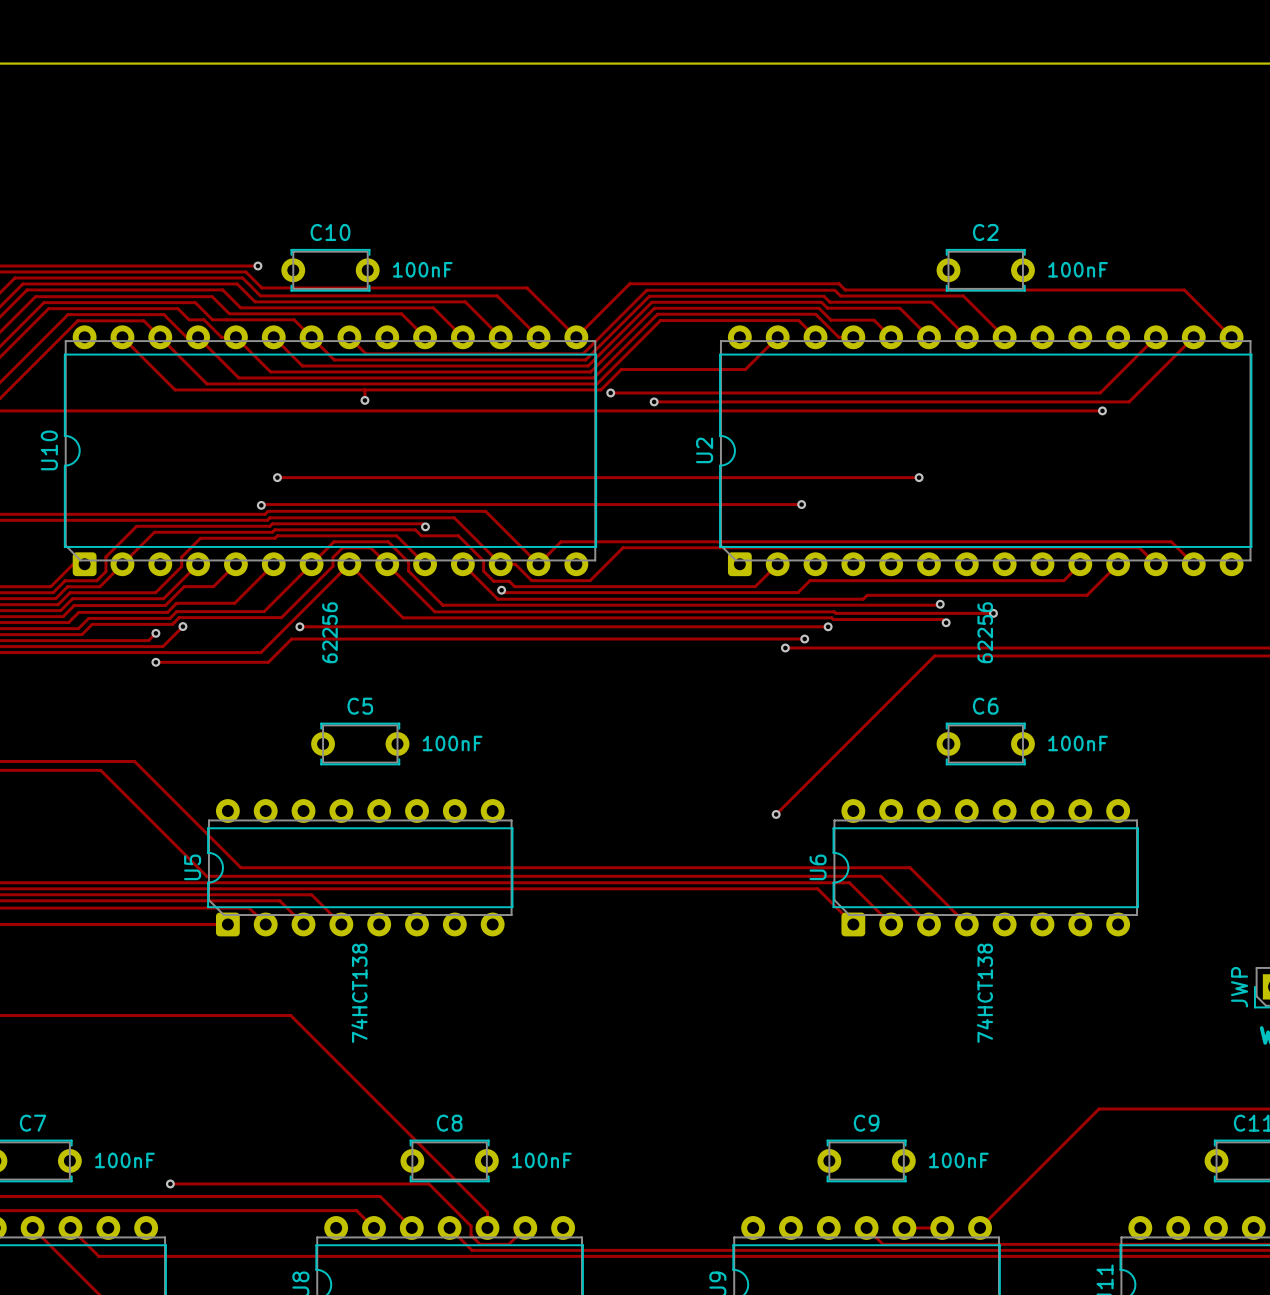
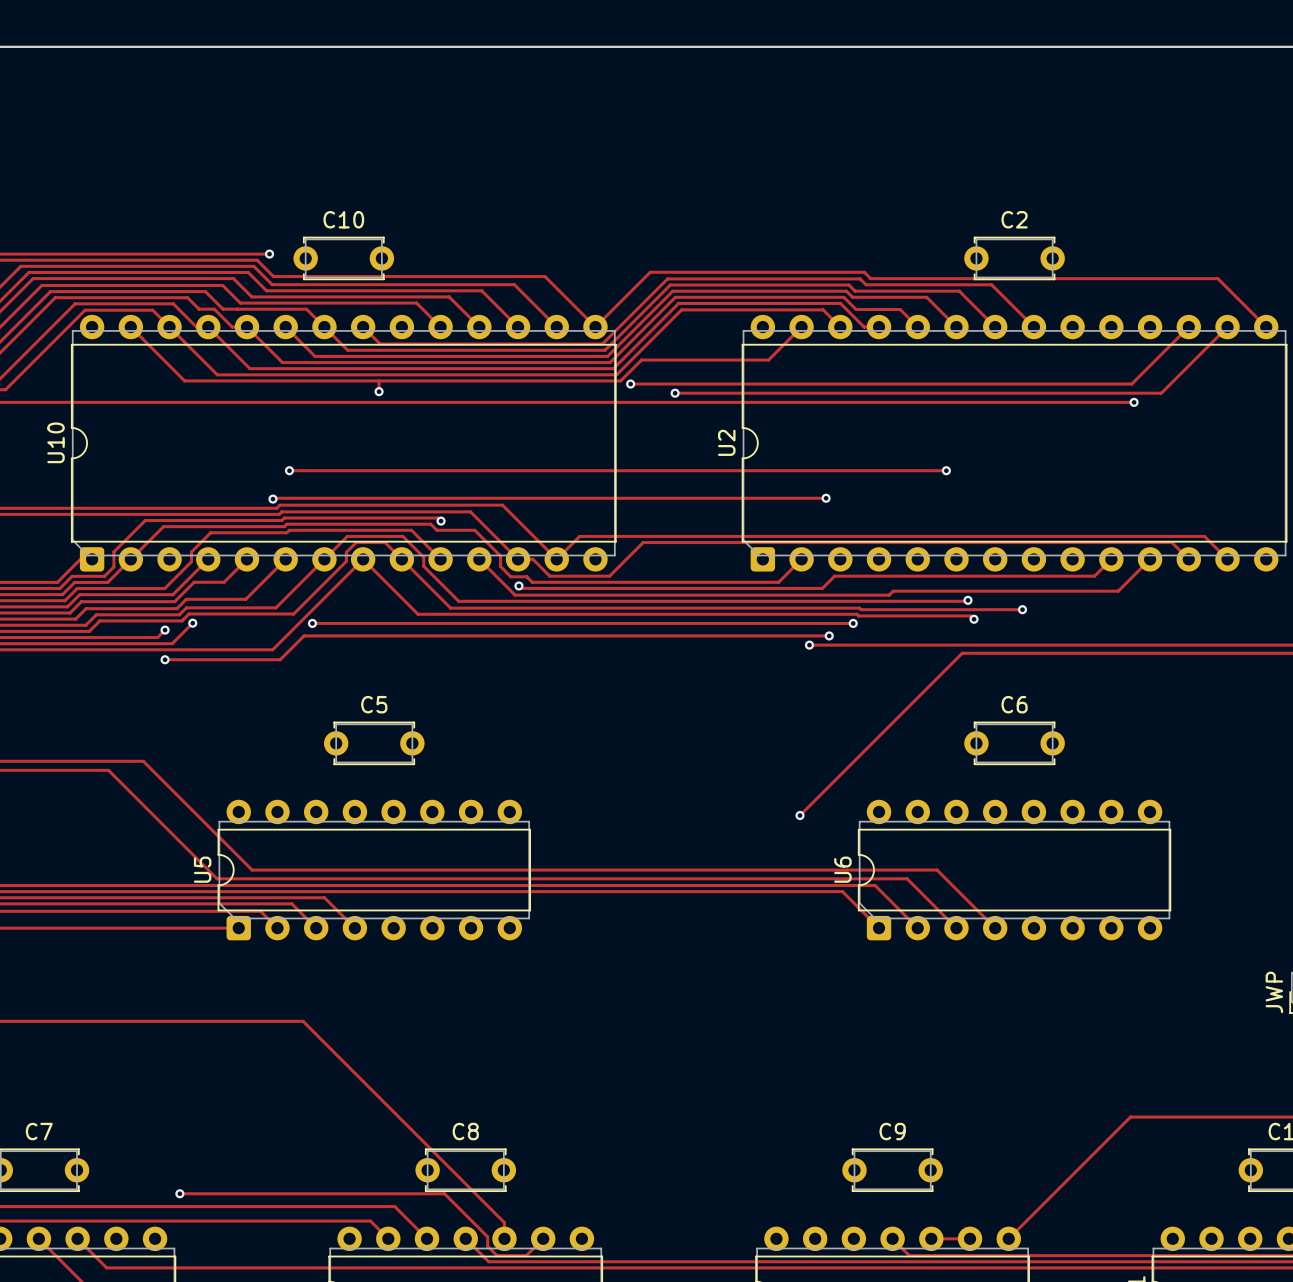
C10 value: 100nF (422, 269) -> none
C2 value: 100nF (1078, 269) -> none
U10 value: 62256 (329, 632) -> none
U2 value: 62256 (985, 632) -> none
C5 value: 100nF (452, 743) -> none
C6 value: 100nF (1078, 743) -> none
U5 value: 74HCT138 (359, 993) -> none
U6 value: 74HCT138 (984, 993) -> none
C7 value: 100nF (124, 1160) -> none
C8 value: 100nF (541, 1160) -> none
C9 value: 100nF (958, 1160) -> none

